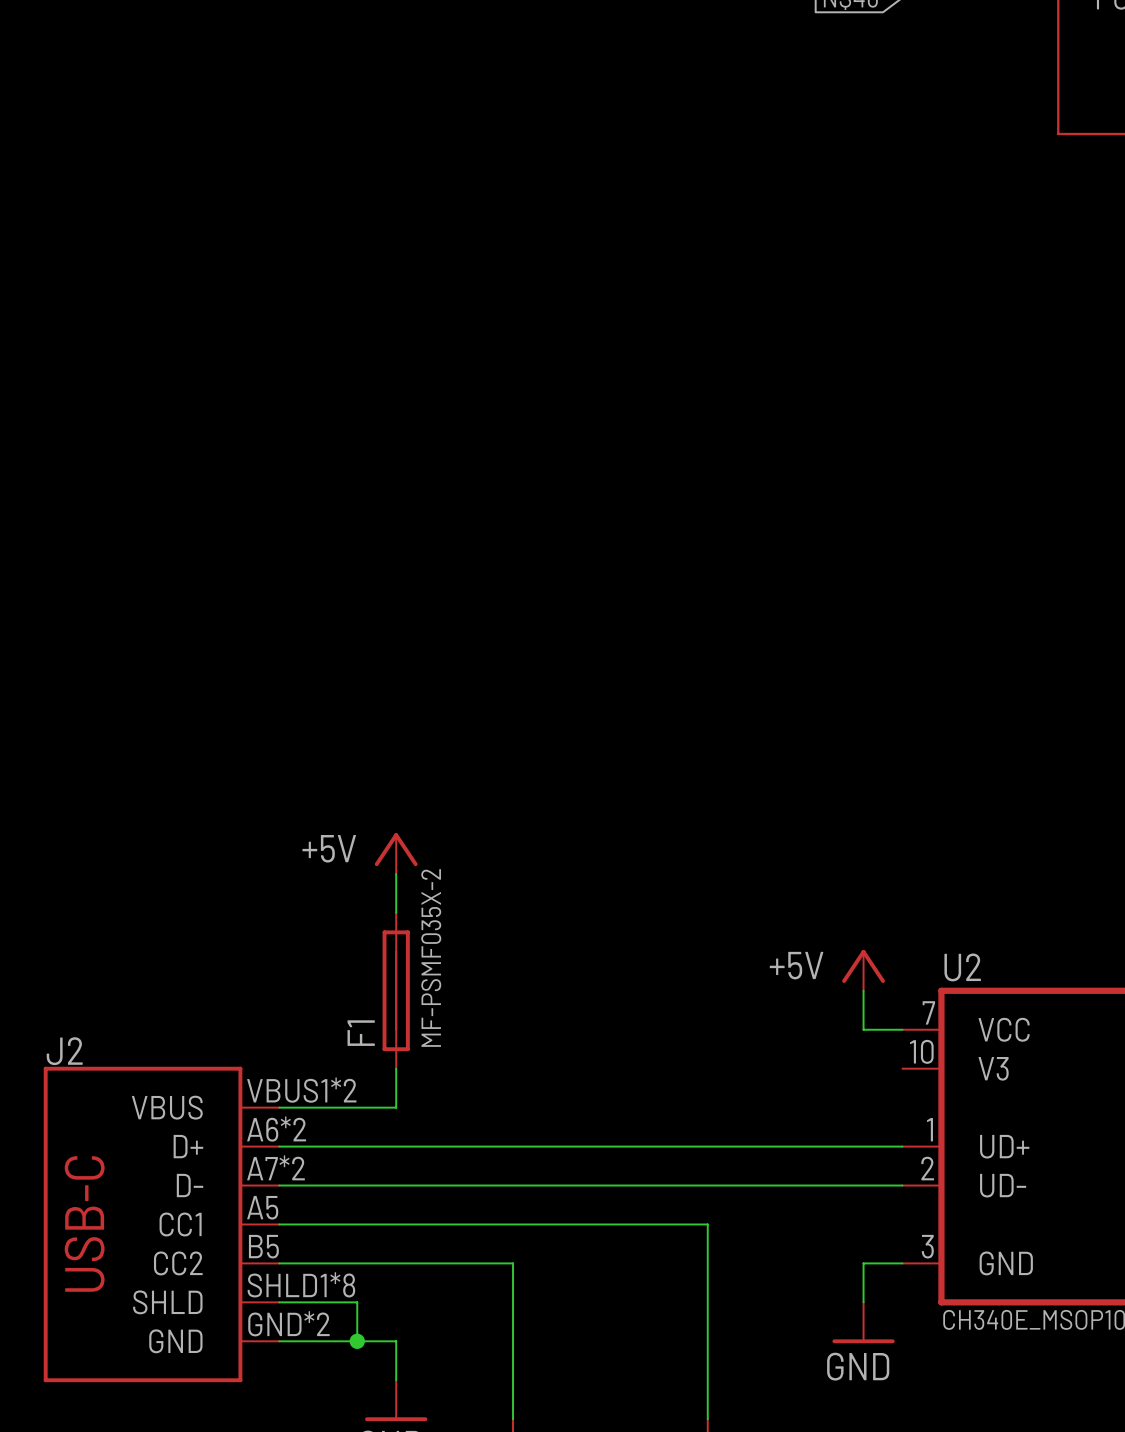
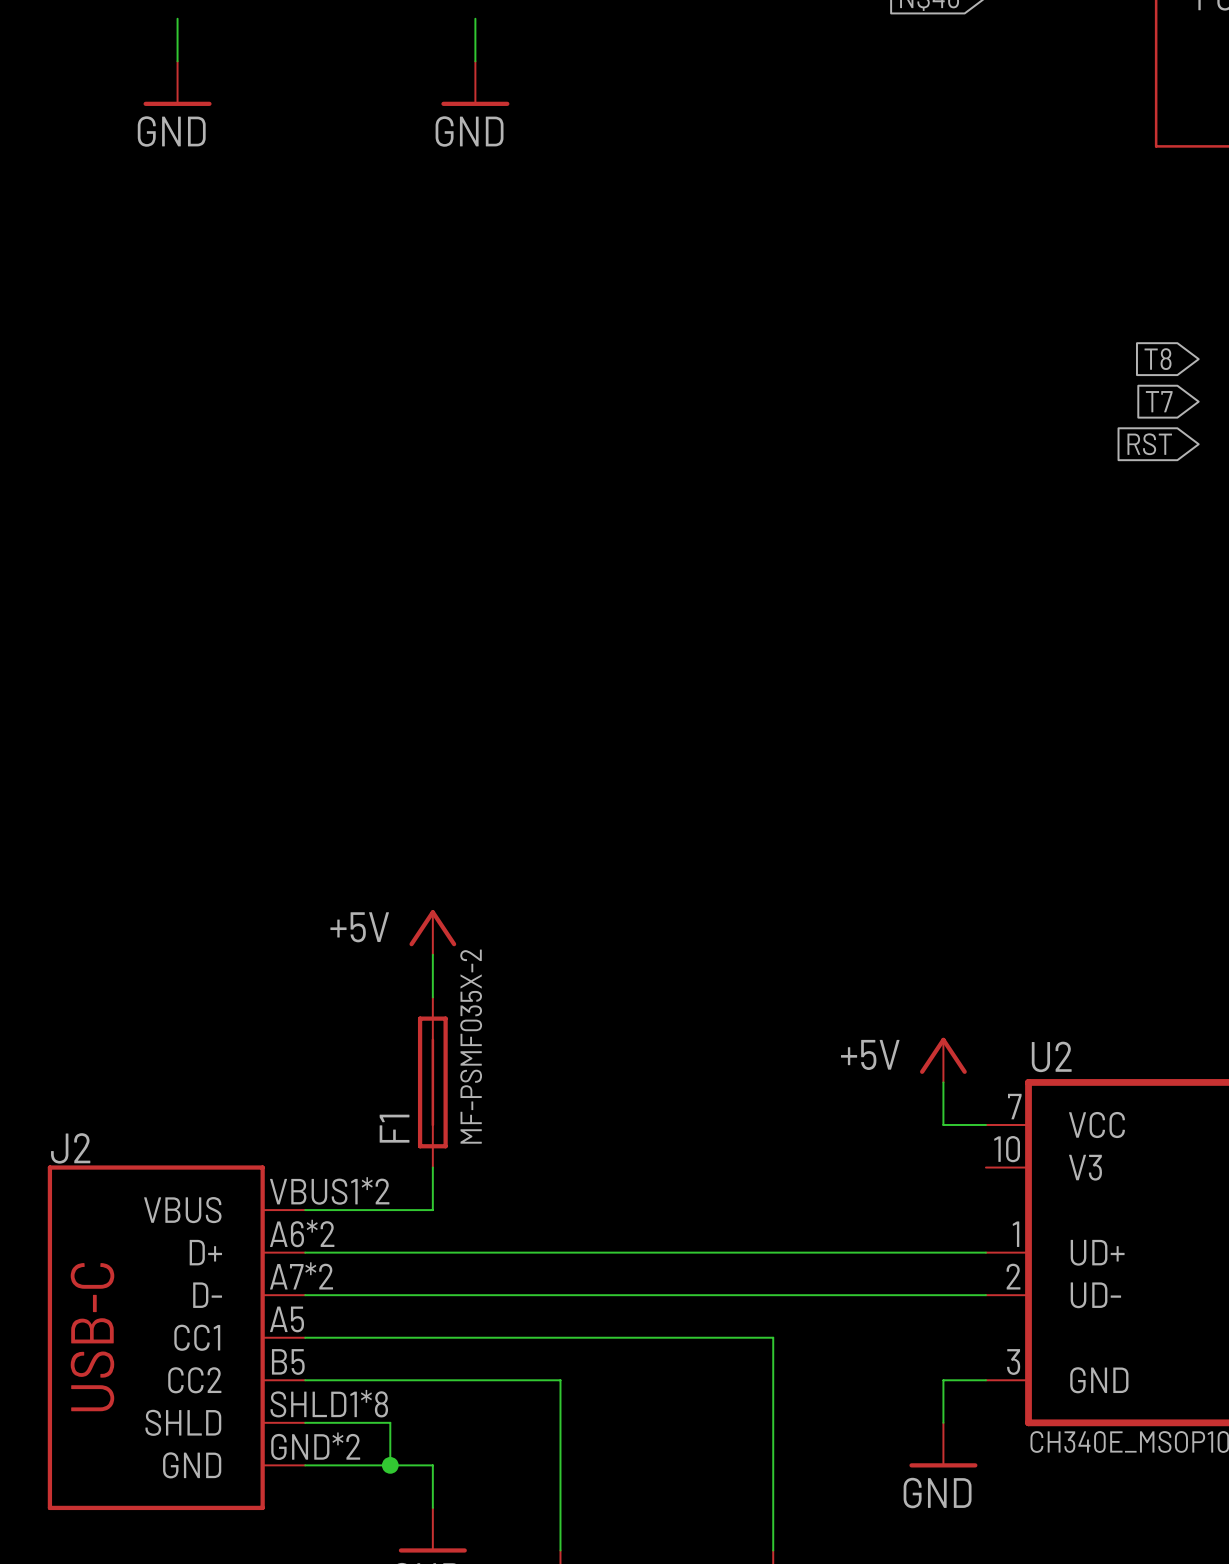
wire: none -> (177, 18) (177, 61)
wire: none -> (475, 18) (475, 61)
power symbol: none -> GND (177, 83)
power symbol: none -> GND (475, 83)
global label: none -> T8 (1158, 359)
global label: none -> T7 (1159, 401)
global label: none -> RST (1149, 444)

